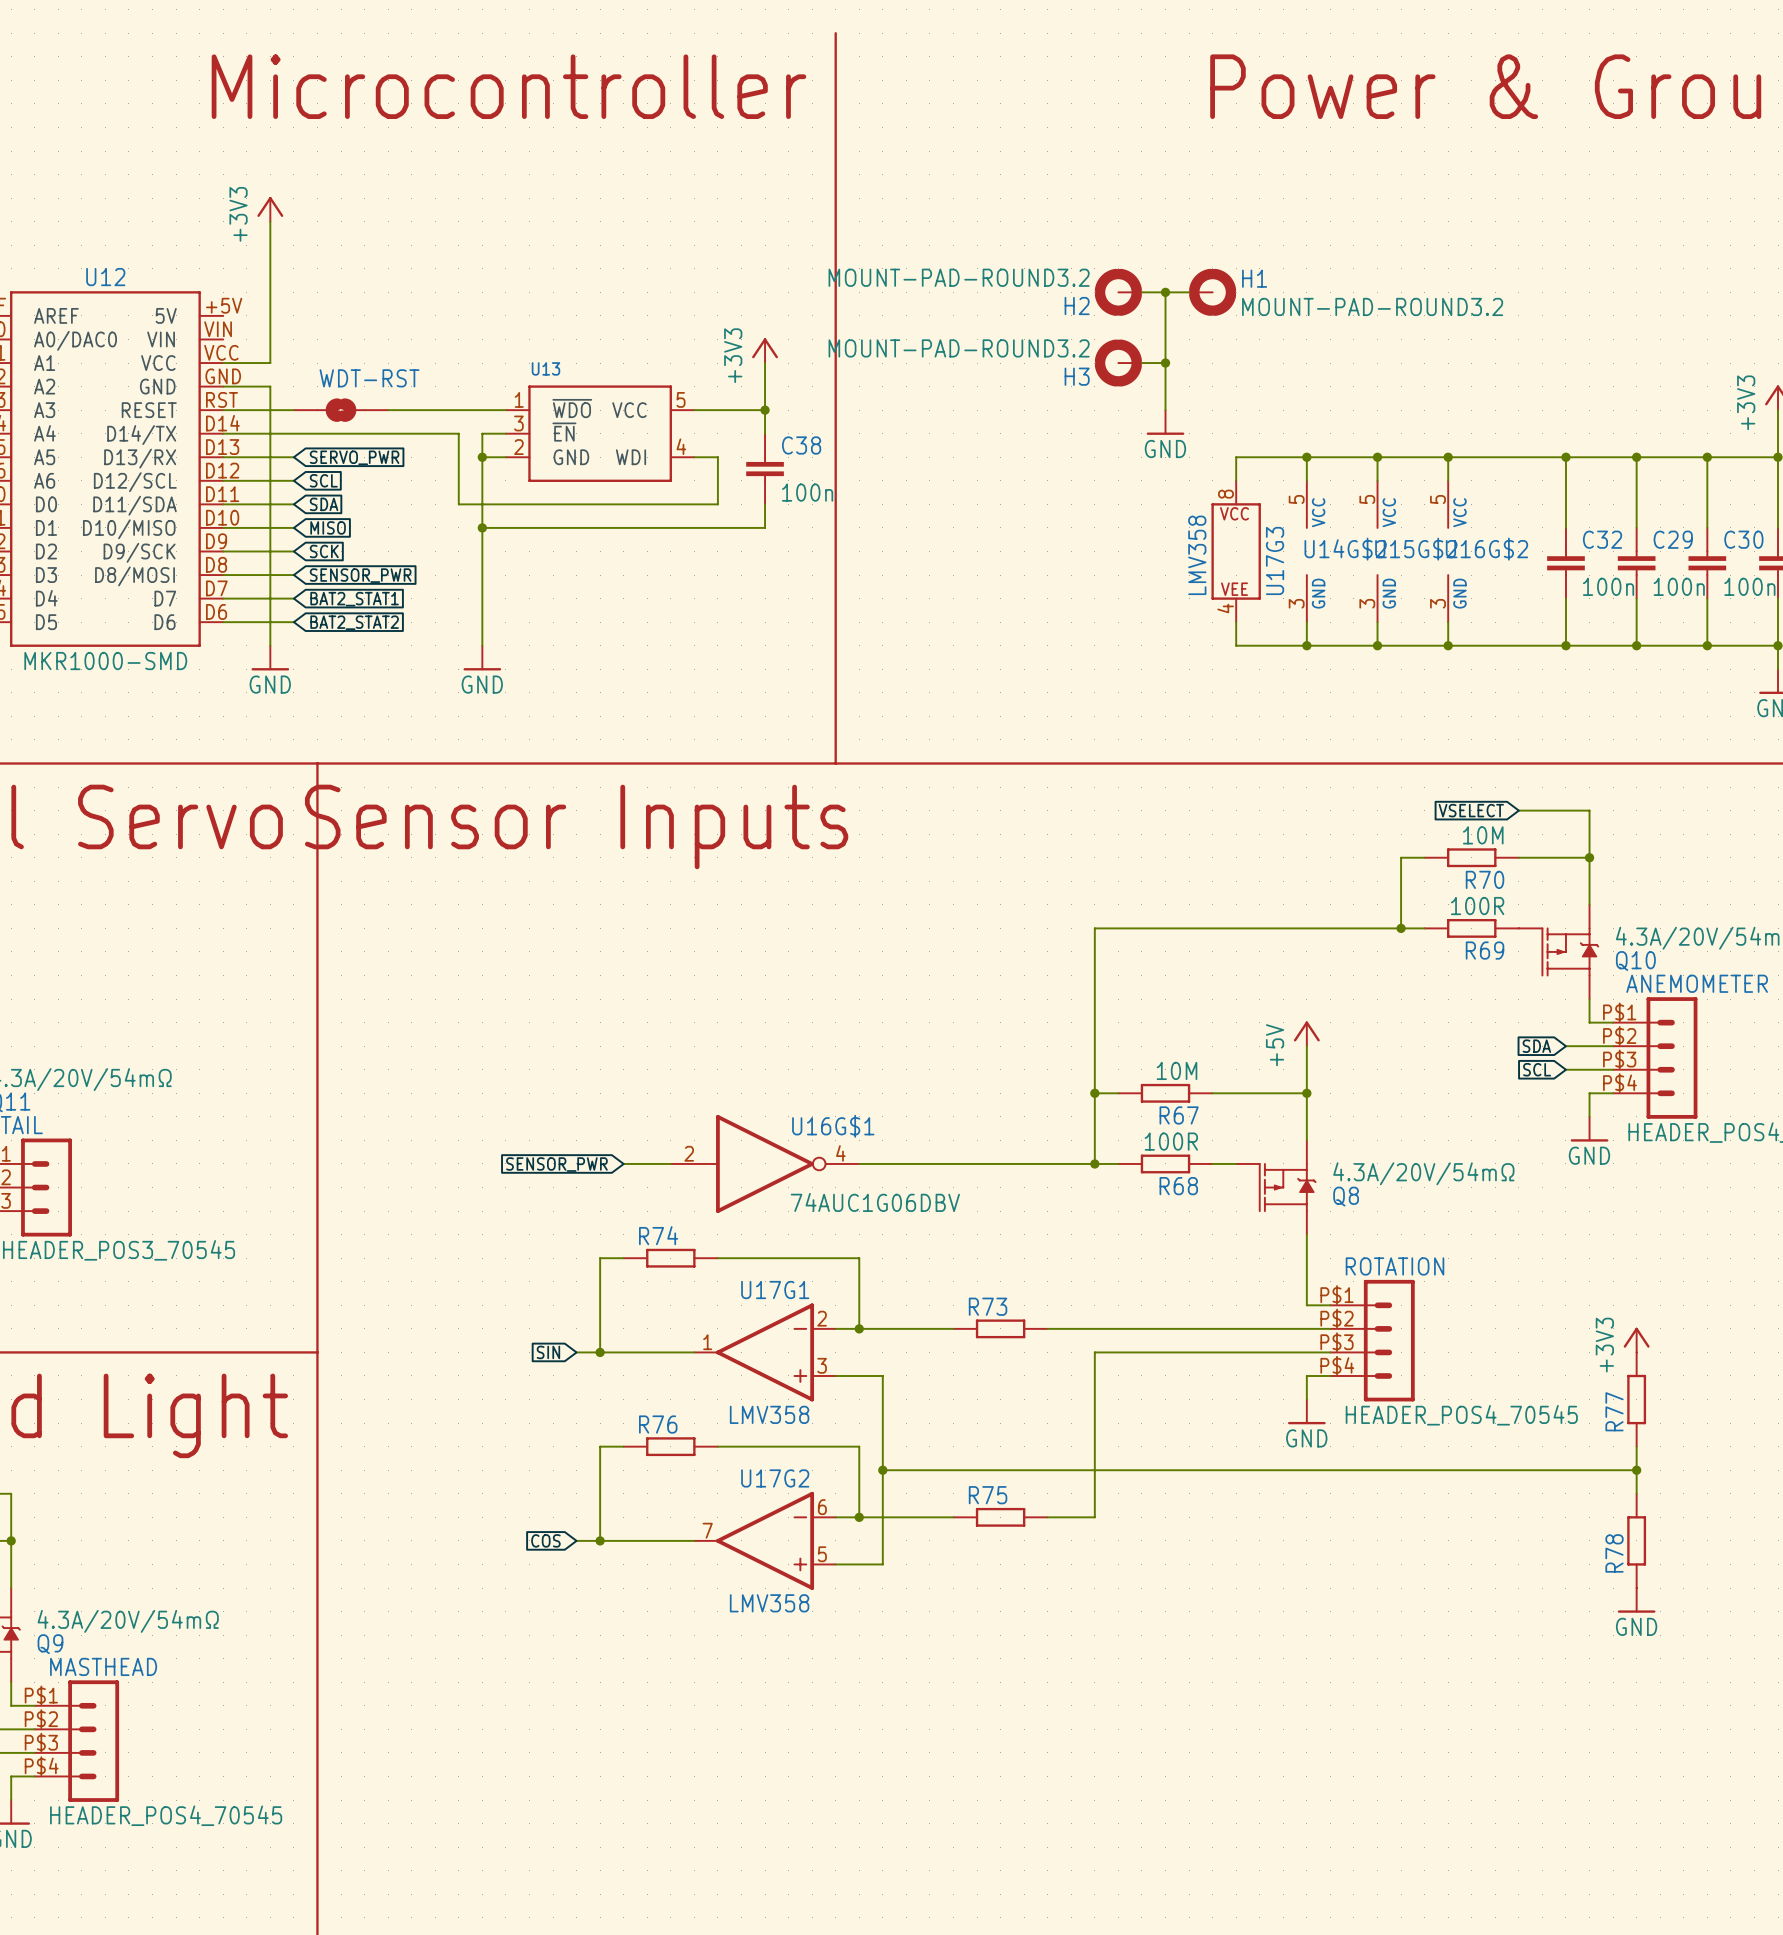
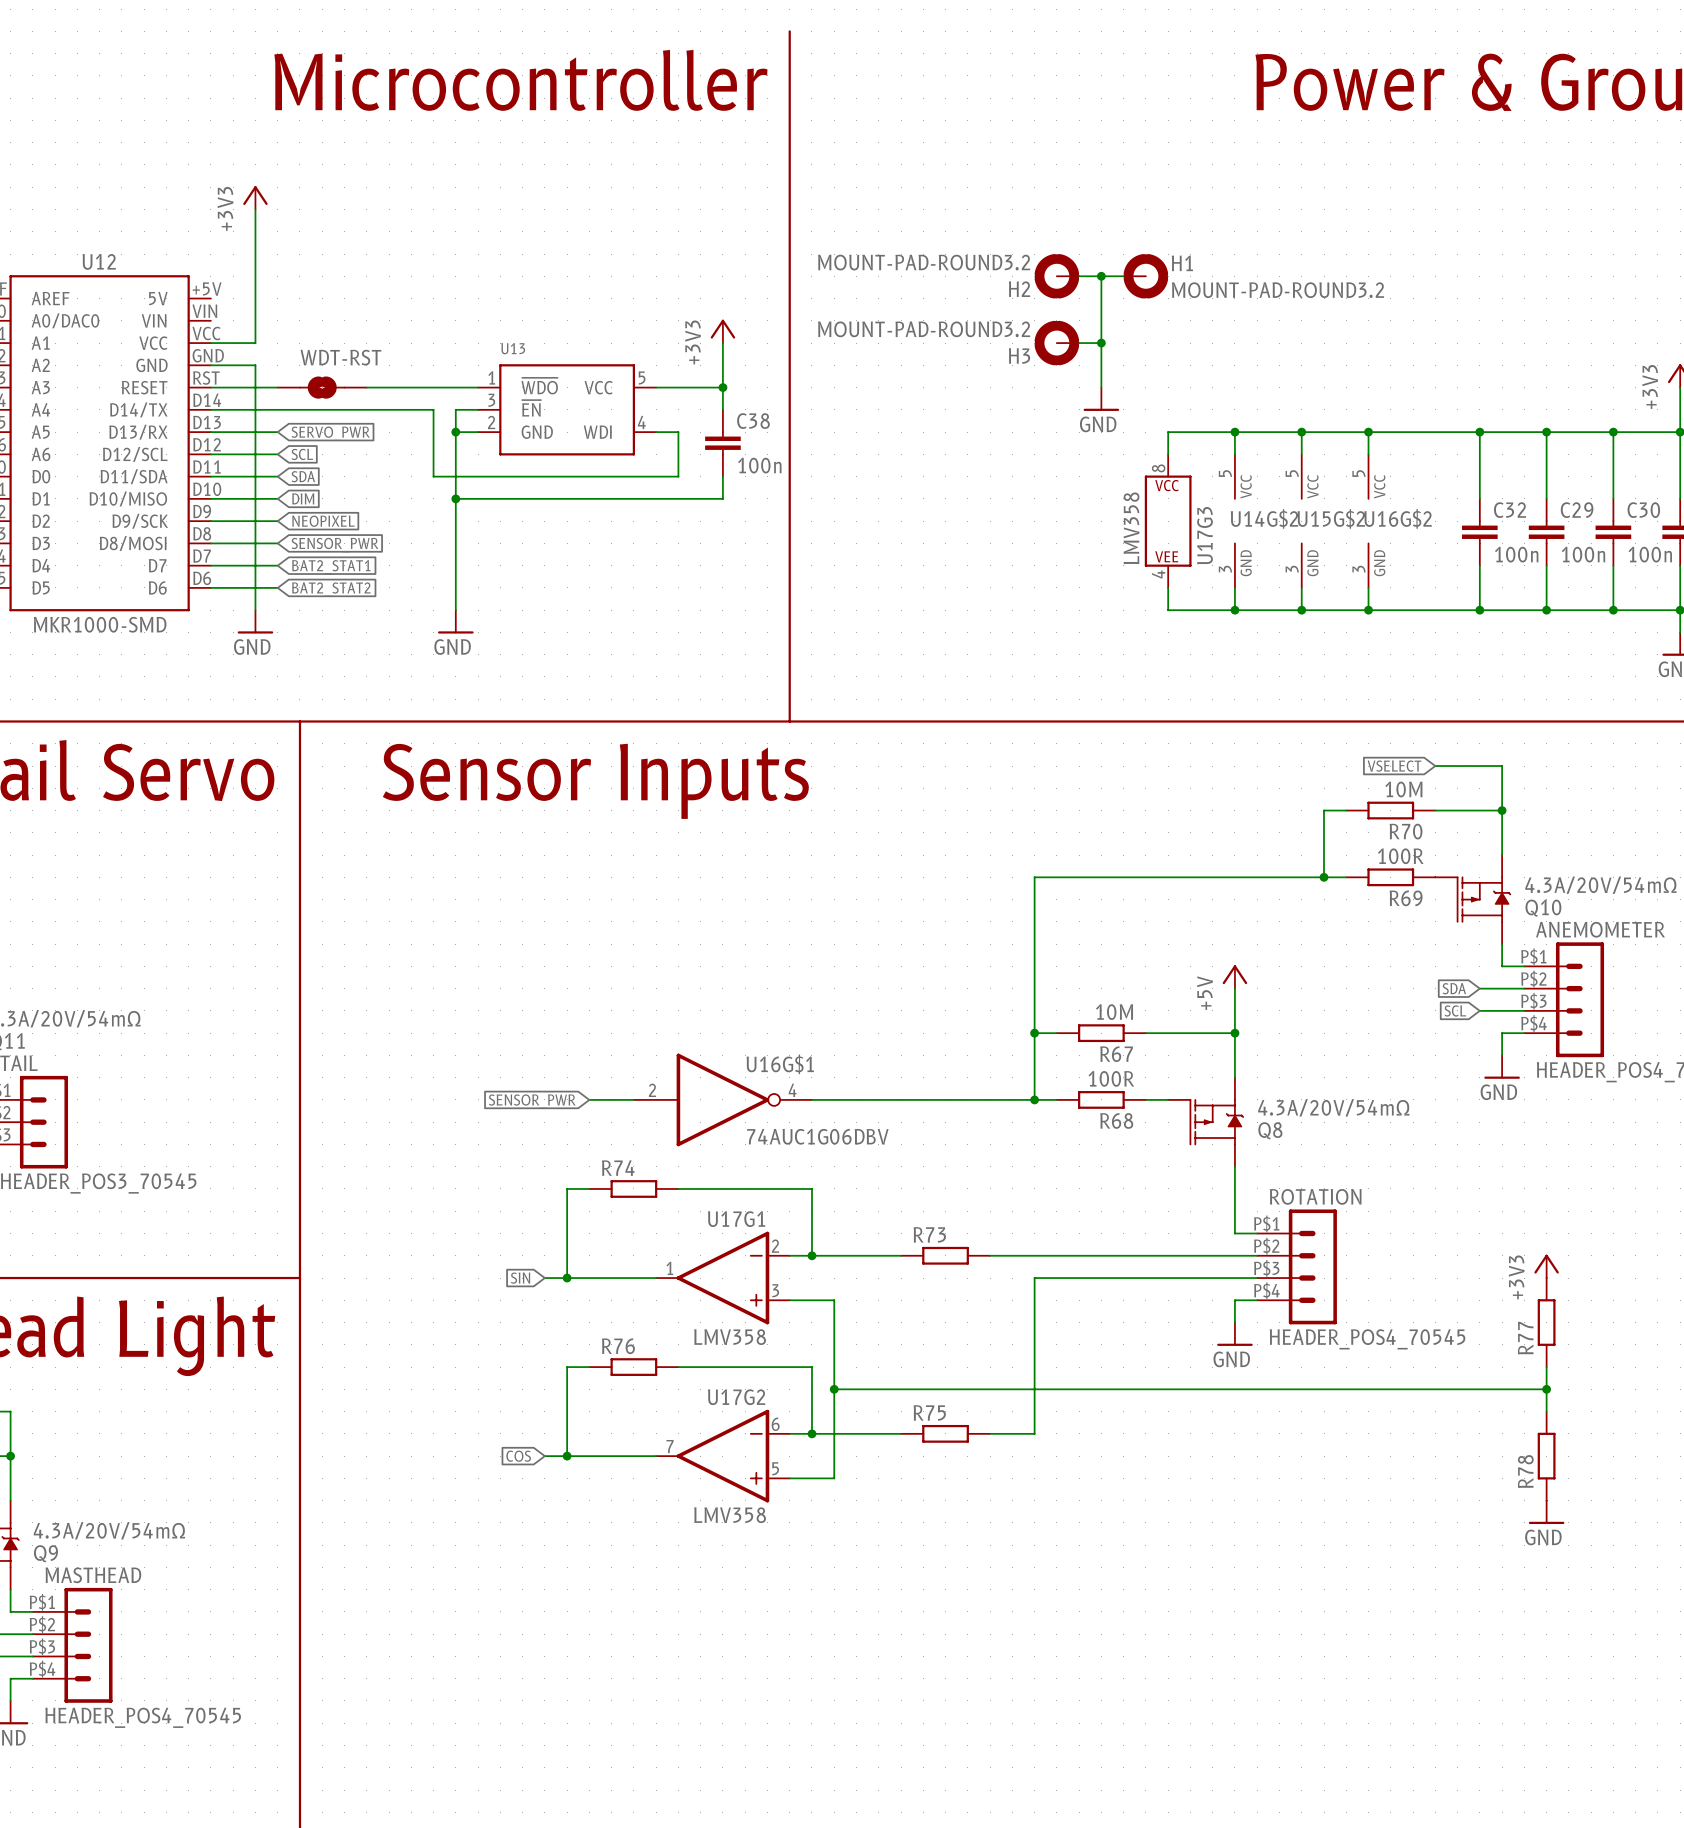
global label: MISO (328, 527) -> DIM (303, 498)
global label: SCK (324, 551) -> NEOPIXEL (323, 521)

